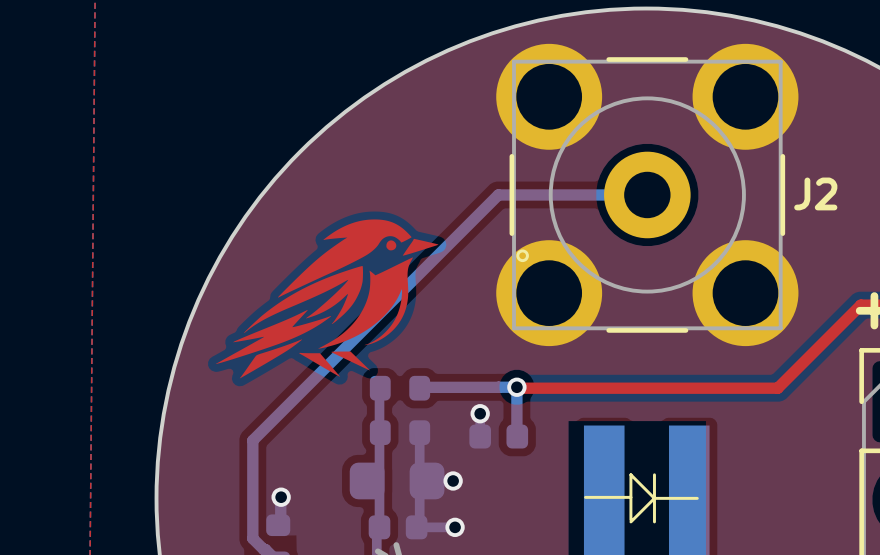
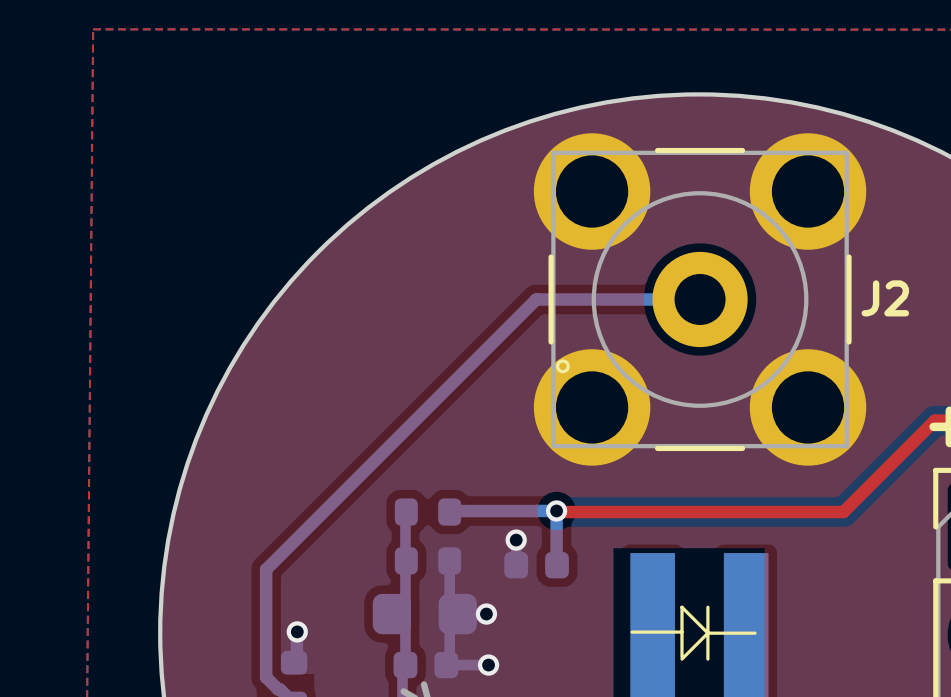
drawing: [215, 219, 439, 379] -> none

